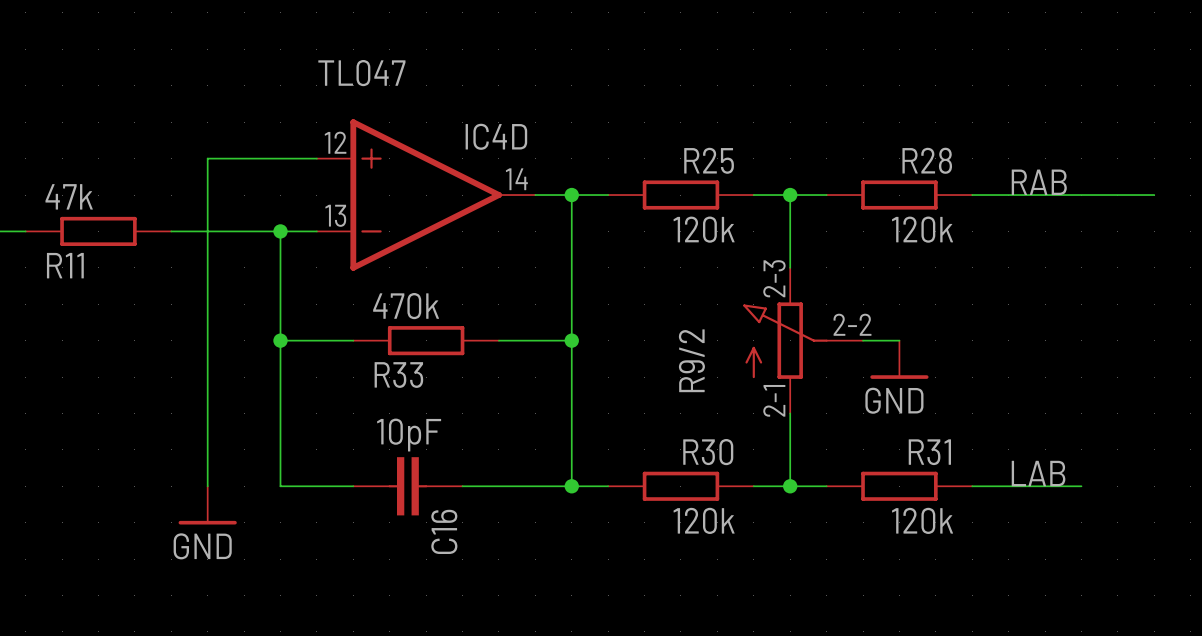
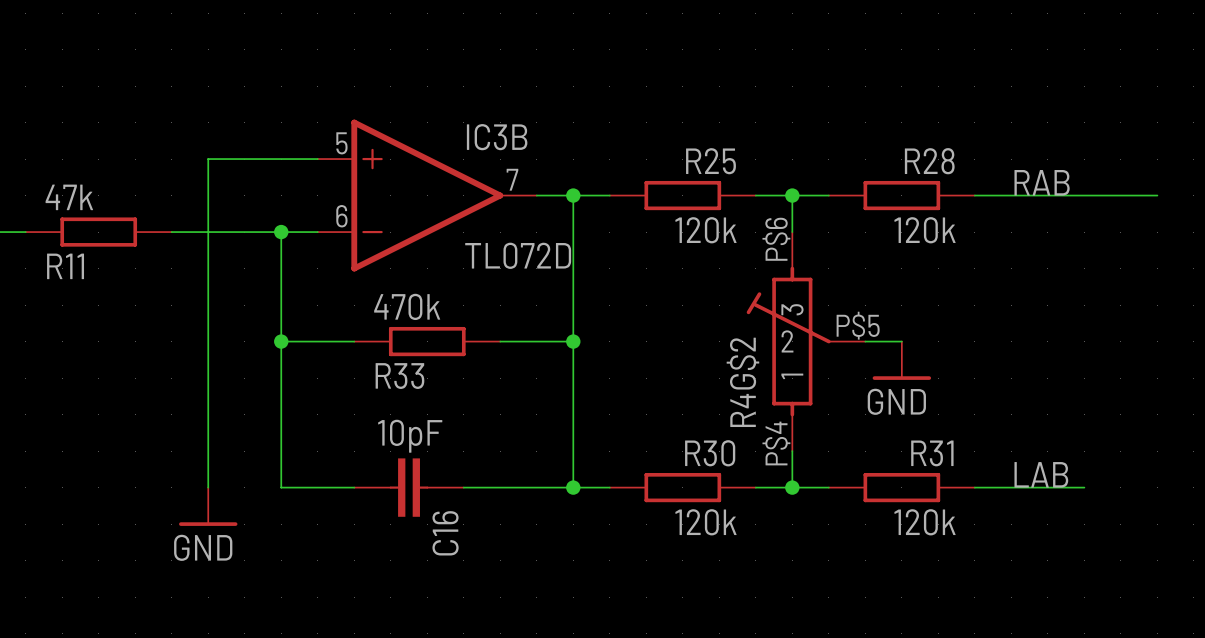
IC4D value: TL047 (361, 73) -> TL072D (518, 255)
IC4D name: IC4D (496, 136) -> IC3B (497, 137)
IC4D pin number: 12 (335, 142) -> 5 (341, 143)
IC4D pin number: 14 (516, 179) -> 7 (512, 179)
IC4D pin number: 13 (335, 215) -> 6 (341, 216)
R9/2: (803, 340) -> none
R4G$2: none -> (806, 341)

